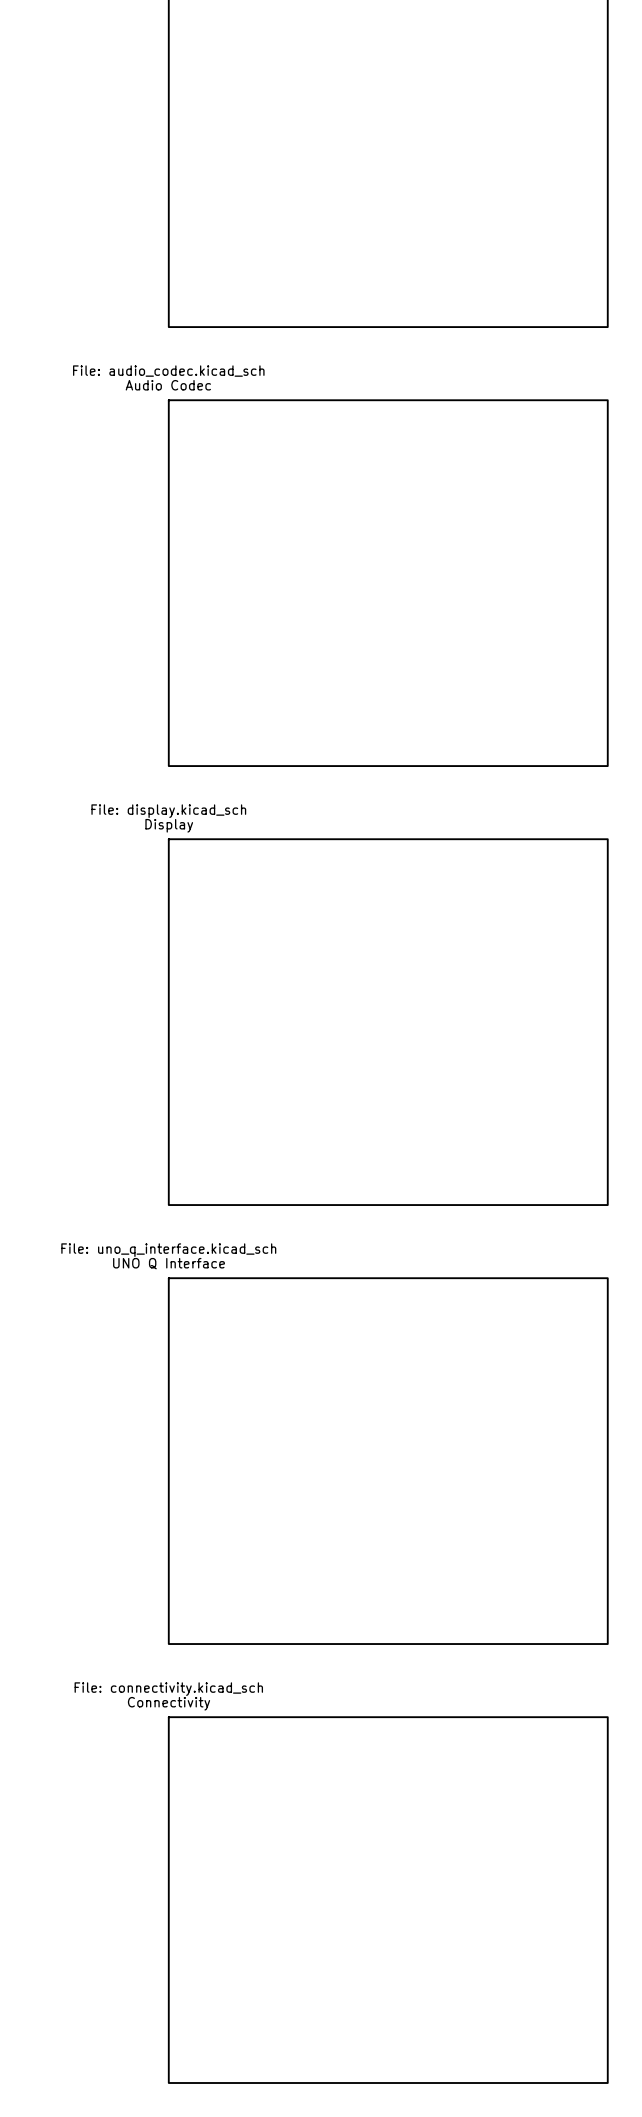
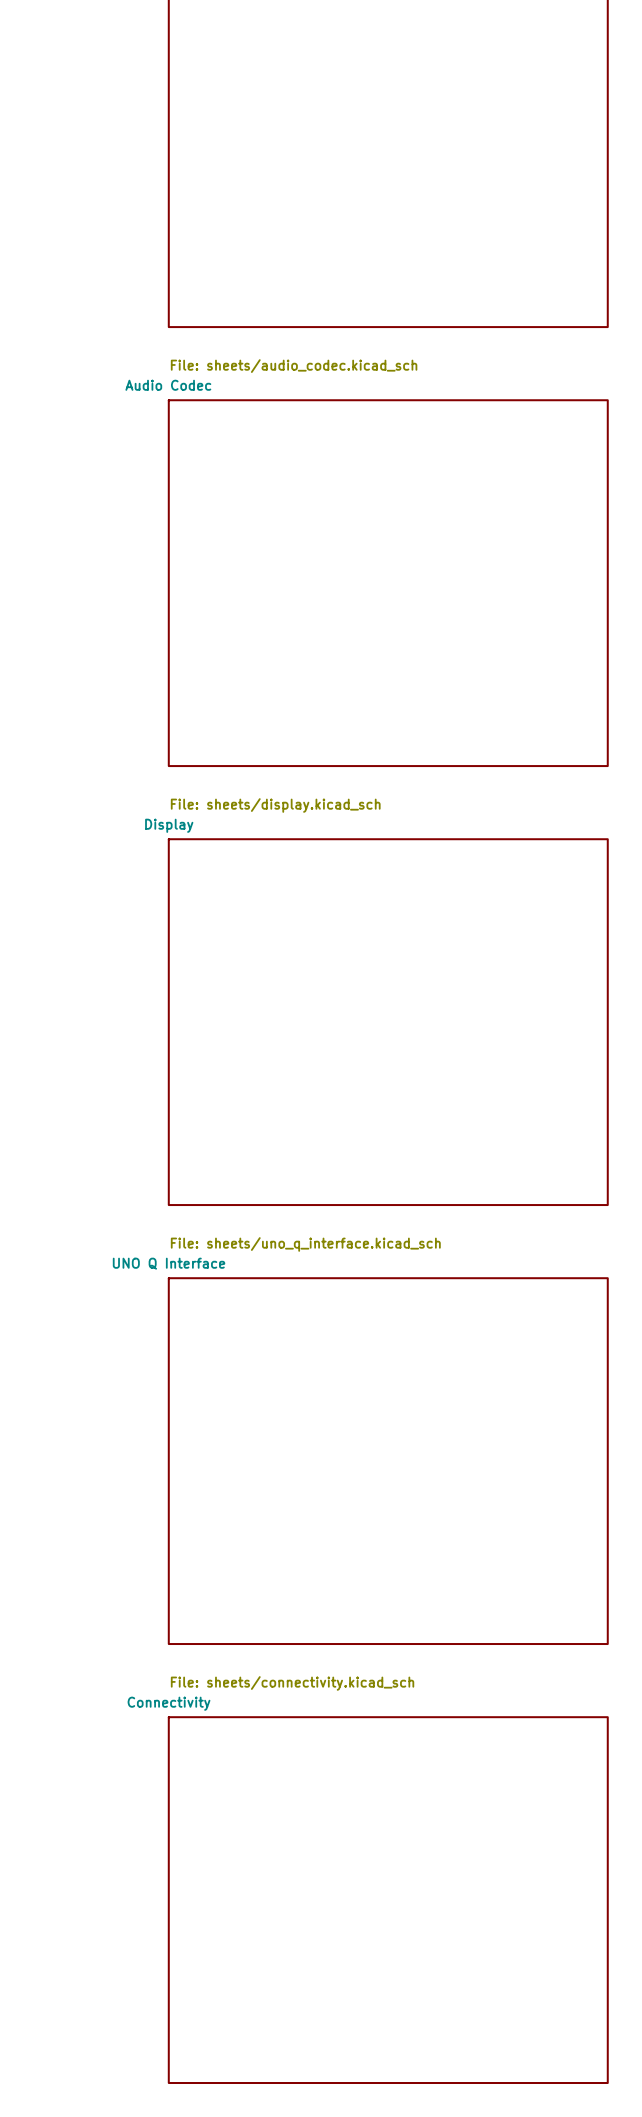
sheet Audio Codec value: File: audio_codec.kicad_sch (168, 371) -> File: sheets/audio_codec.kicad_sch (294, 366)
sheet Display value: File: display.kicad_sch (168, 811) -> File: sheets/display.kicad_sch (275, 805)
sheet UNO Q Interface value: File: uno_q_interface.kicad_sch (168, 1250) -> File: sheets/uno_q_interface.kicad_sch (305, 1244)
sheet Connectivity value: File: connectivity.kicad_sch (168, 1689) -> File: sheets/connectivity.kicad_sch (292, 1683)

